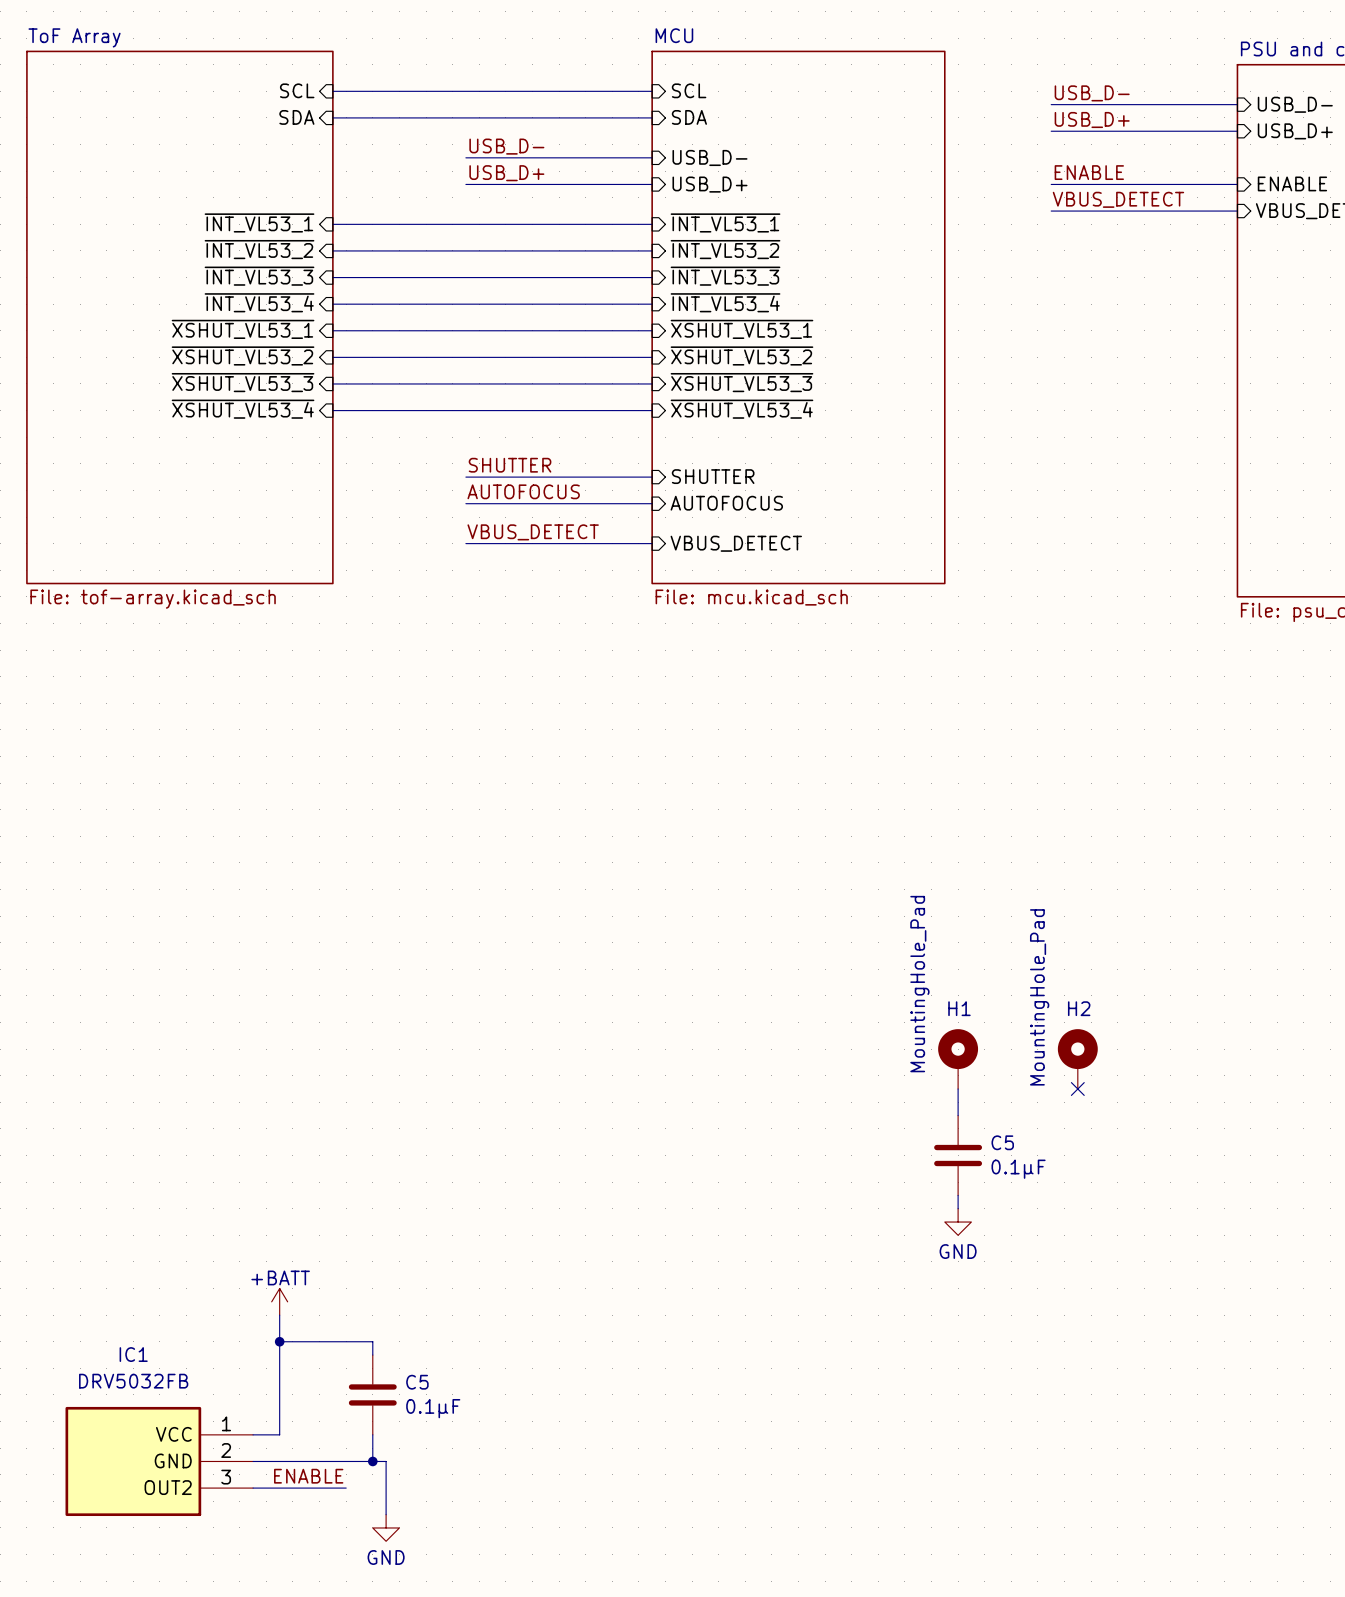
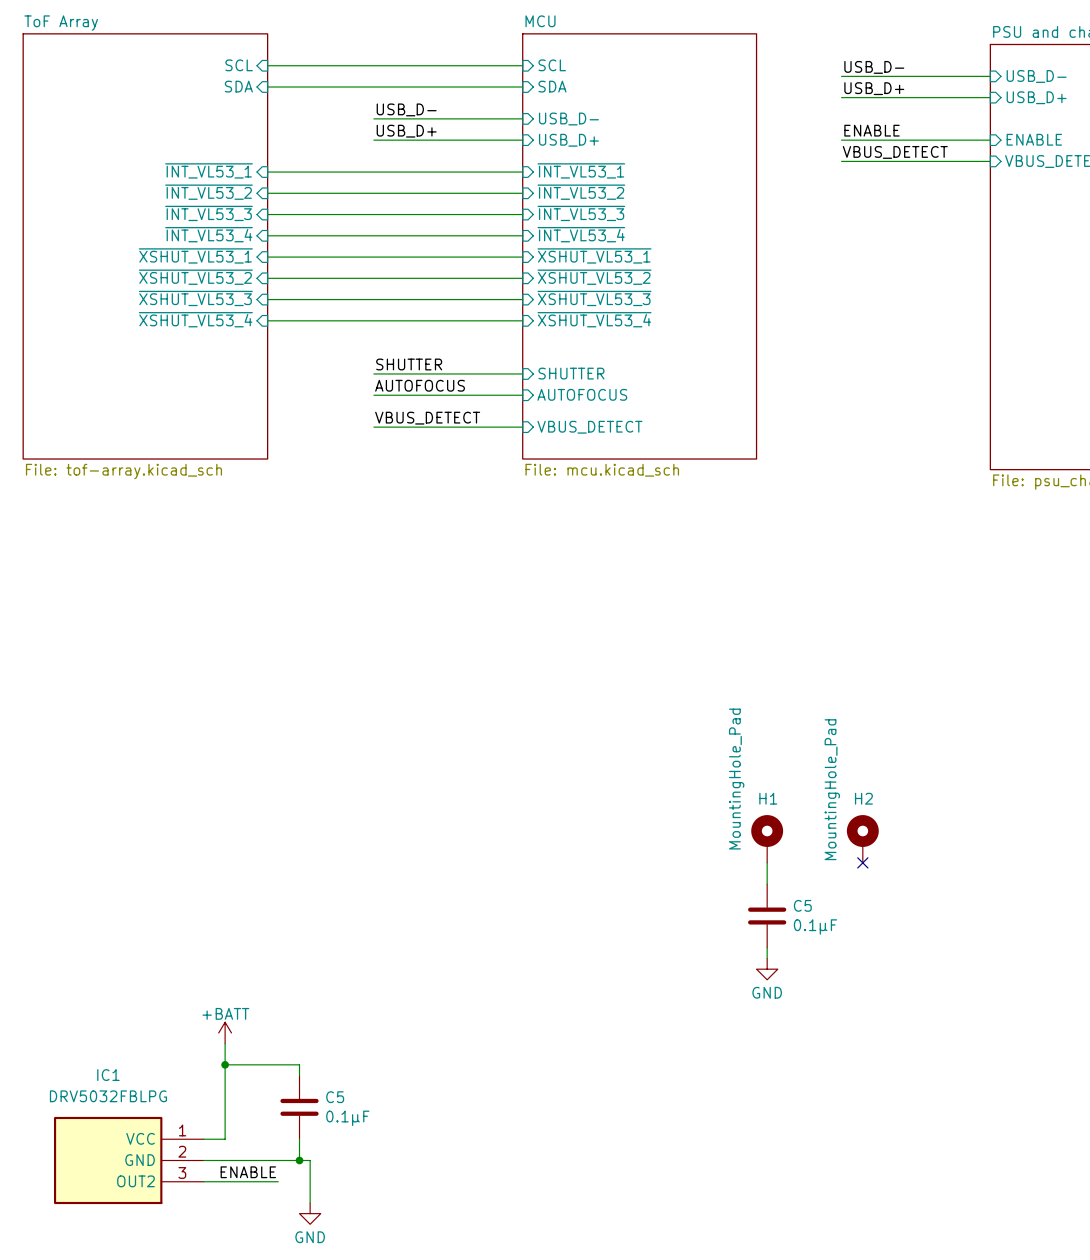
IC1 value: DRV5032FB (133, 1381) -> DRV5032FBLPG (108, 1096)

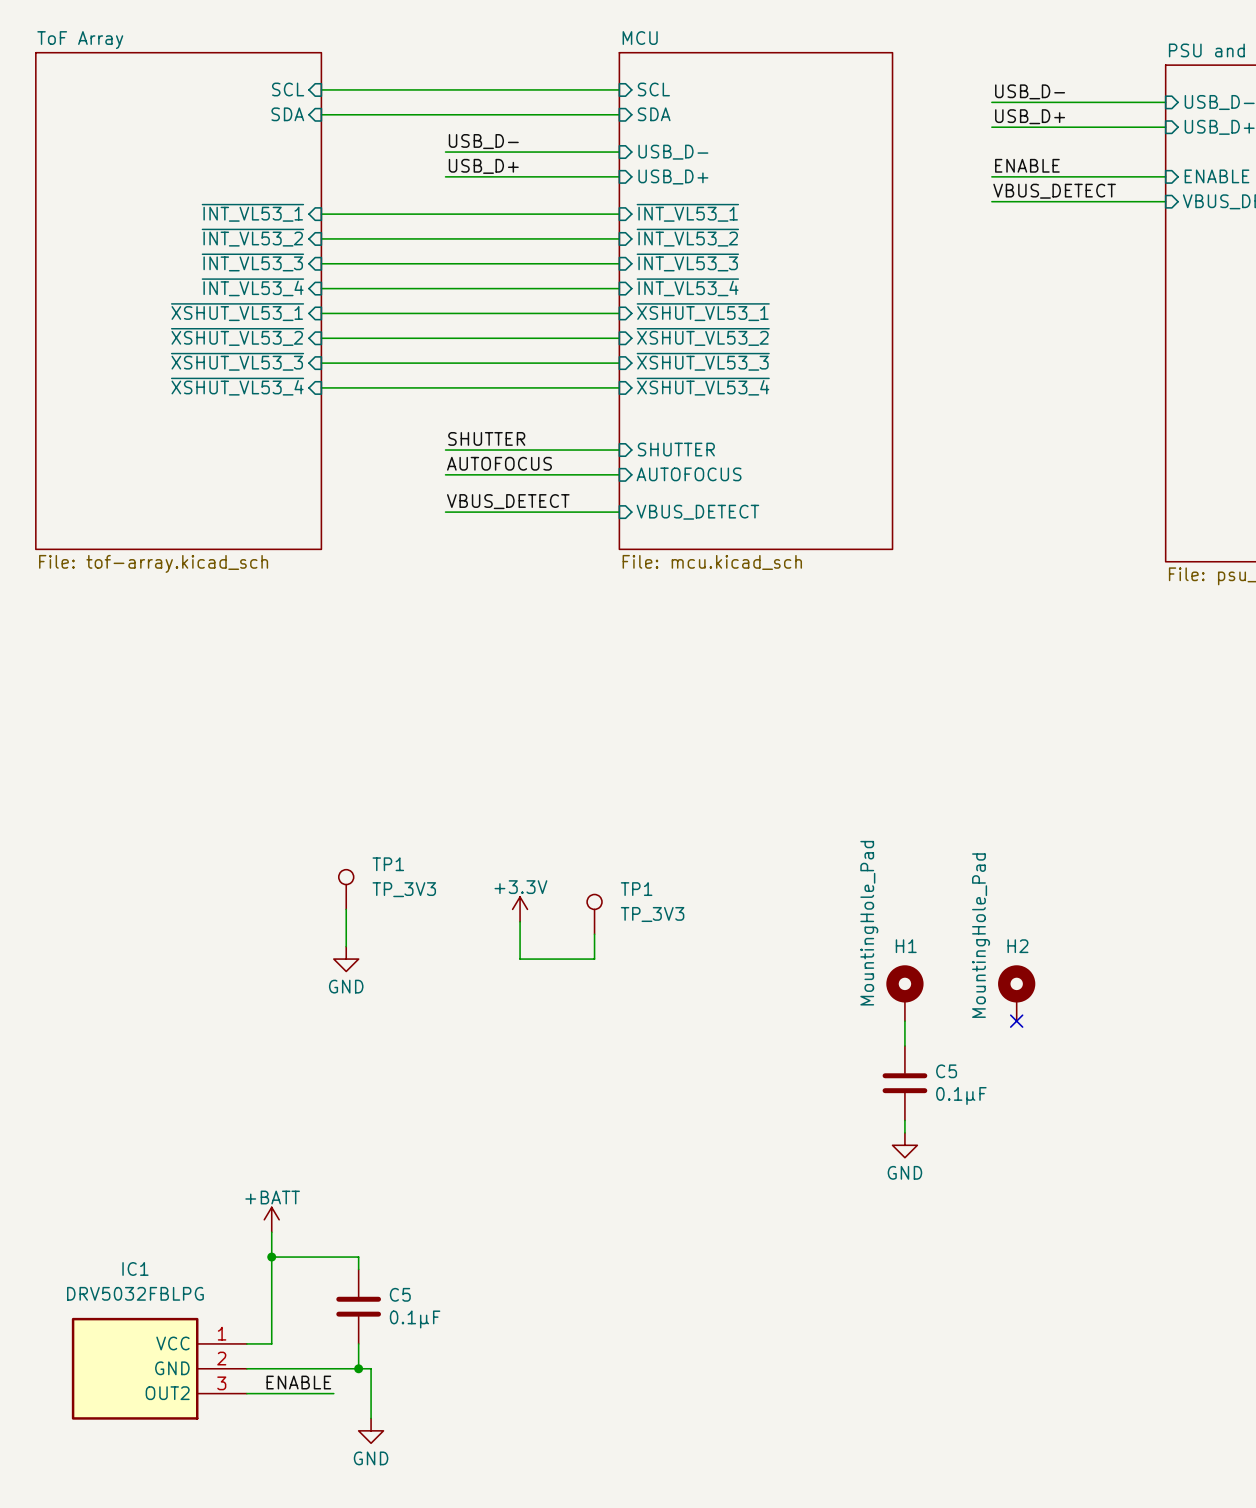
TP1: none -> TP_3V3 (346, 889)
wire: none -> (346, 909) (346, 946)
power symbol: none -> +3.3V (520, 909)
TP1: none -> TP_3V3 (594, 914)
wire: none -> (520, 921) (520, 959) (594, 959) (594, 934)
power symbol: none -> GND (346, 959)

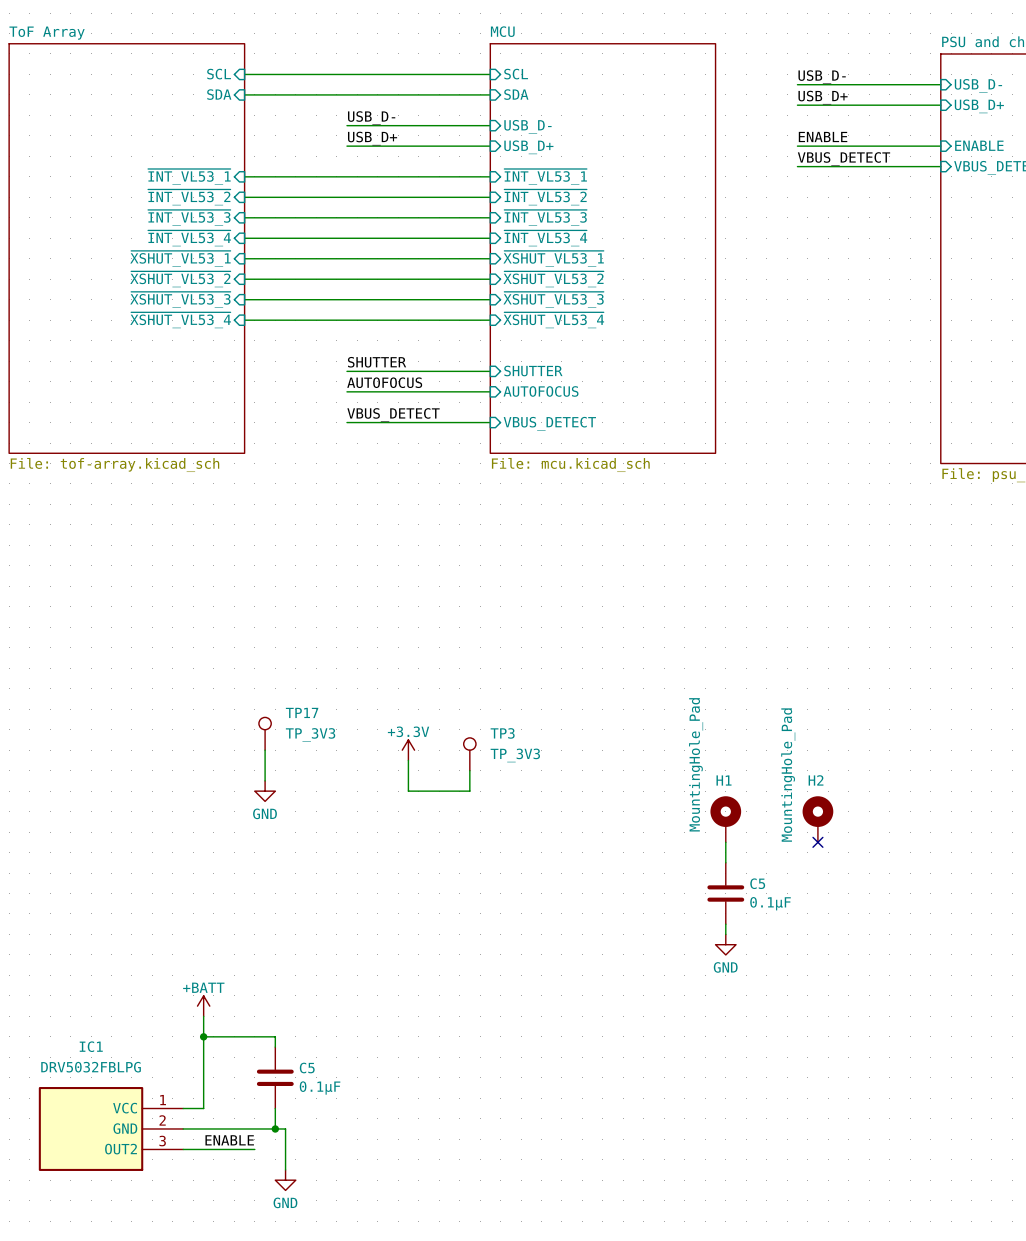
TP1 name: TP1 (388, 864) -> TP17 (302, 712)
TP1 name: TP1 (636, 889) -> TP3 (502, 733)

